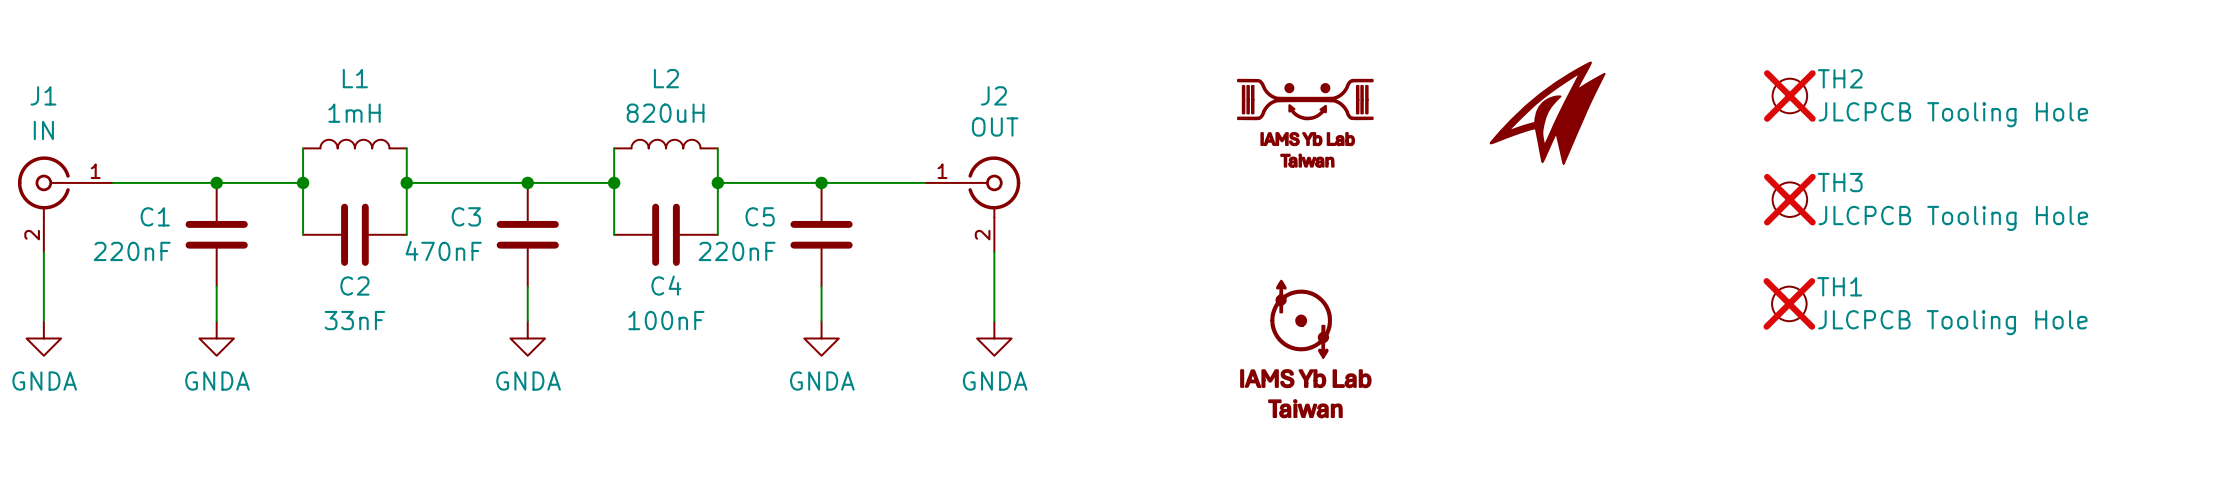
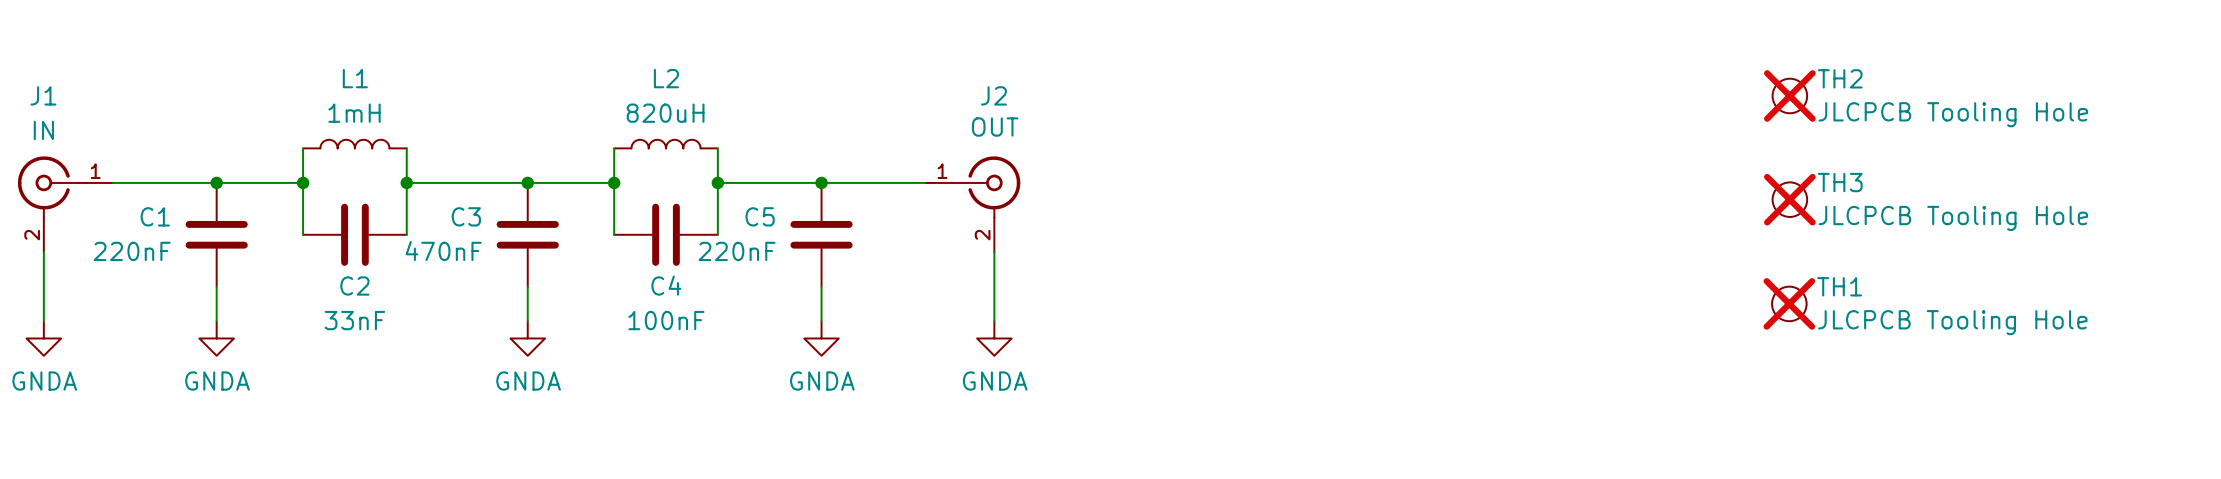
part: (1547, 113) -> none
part: (1305, 123) -> none
part: (1305, 349) -> none

